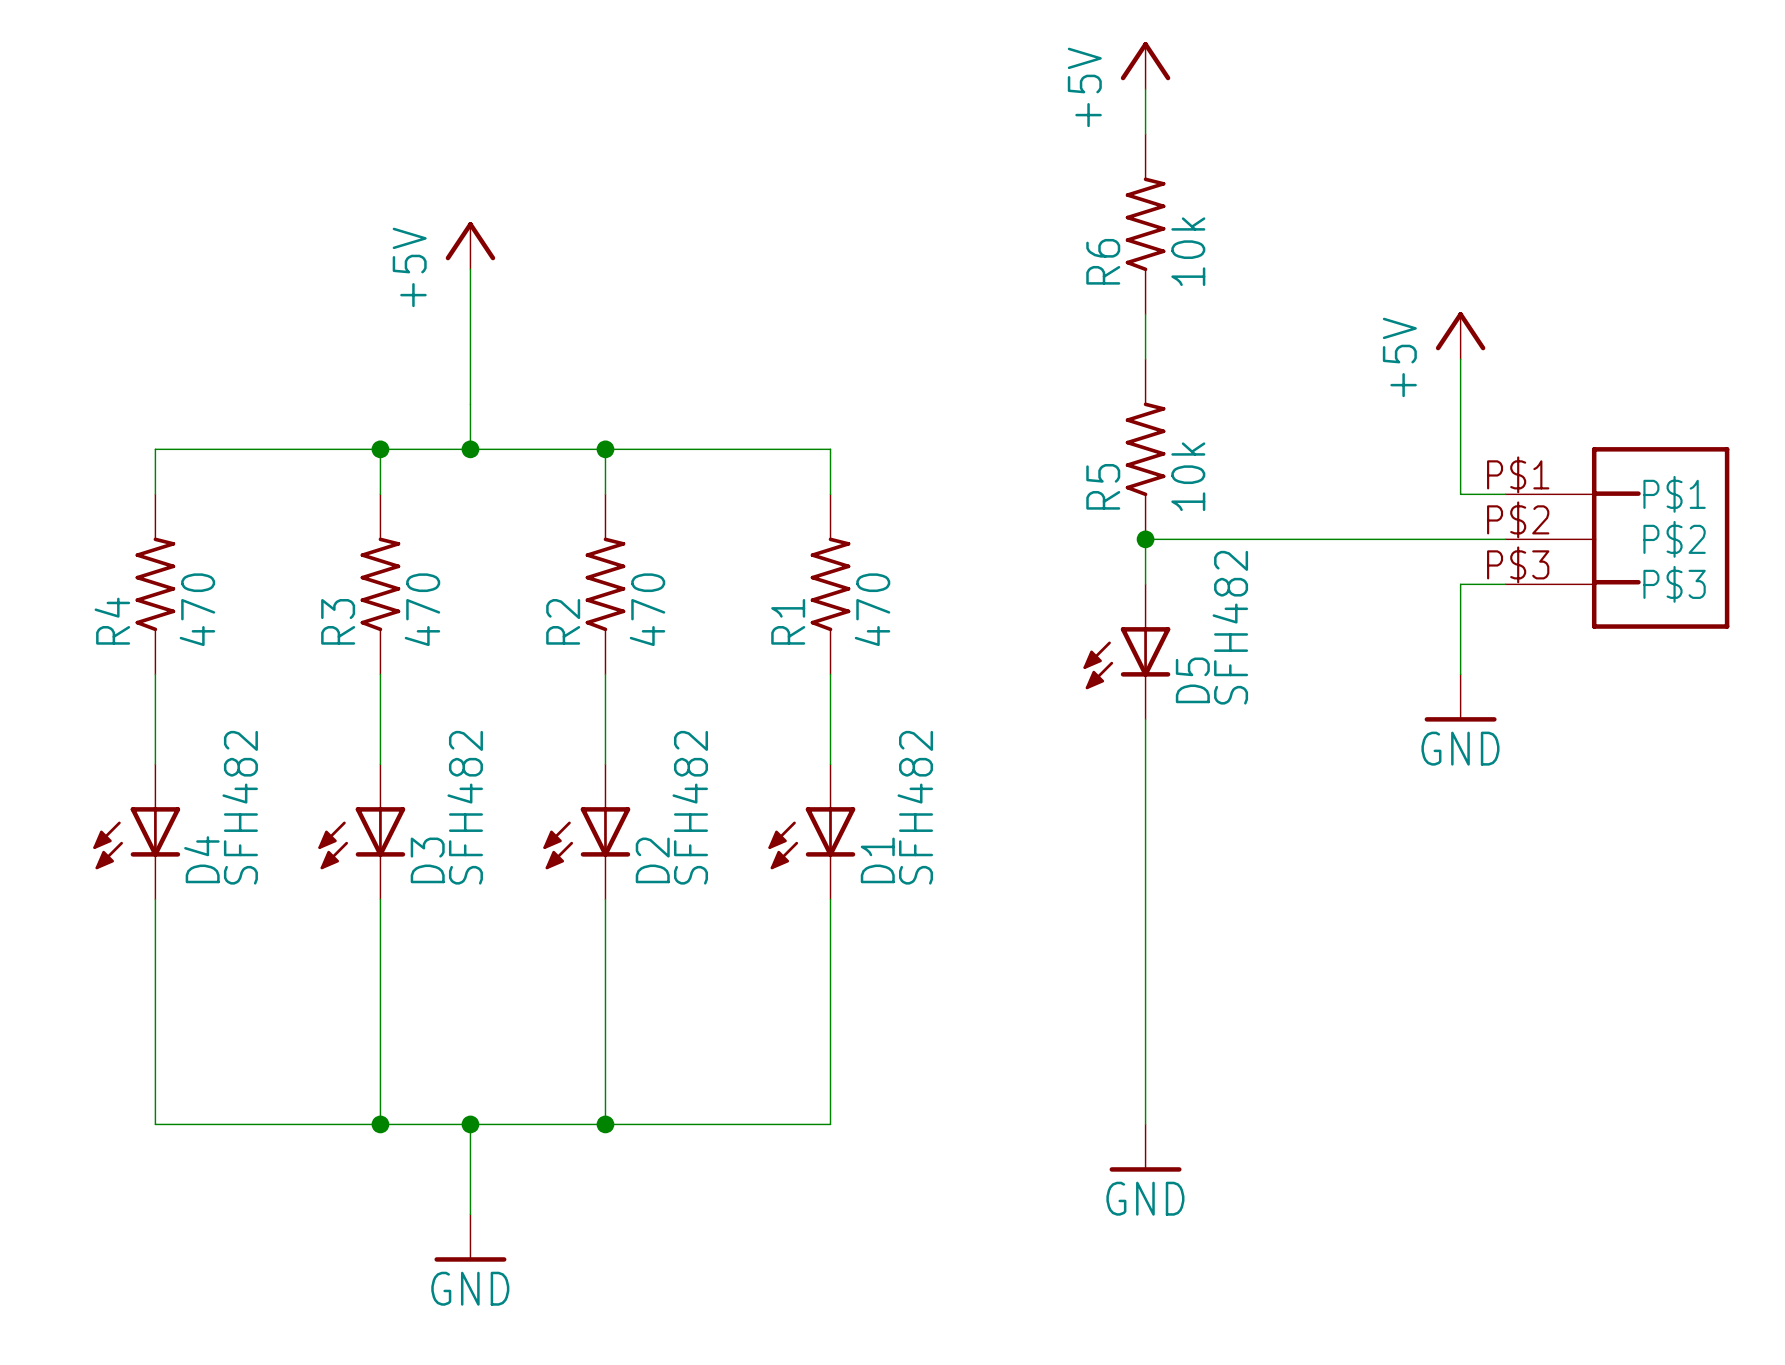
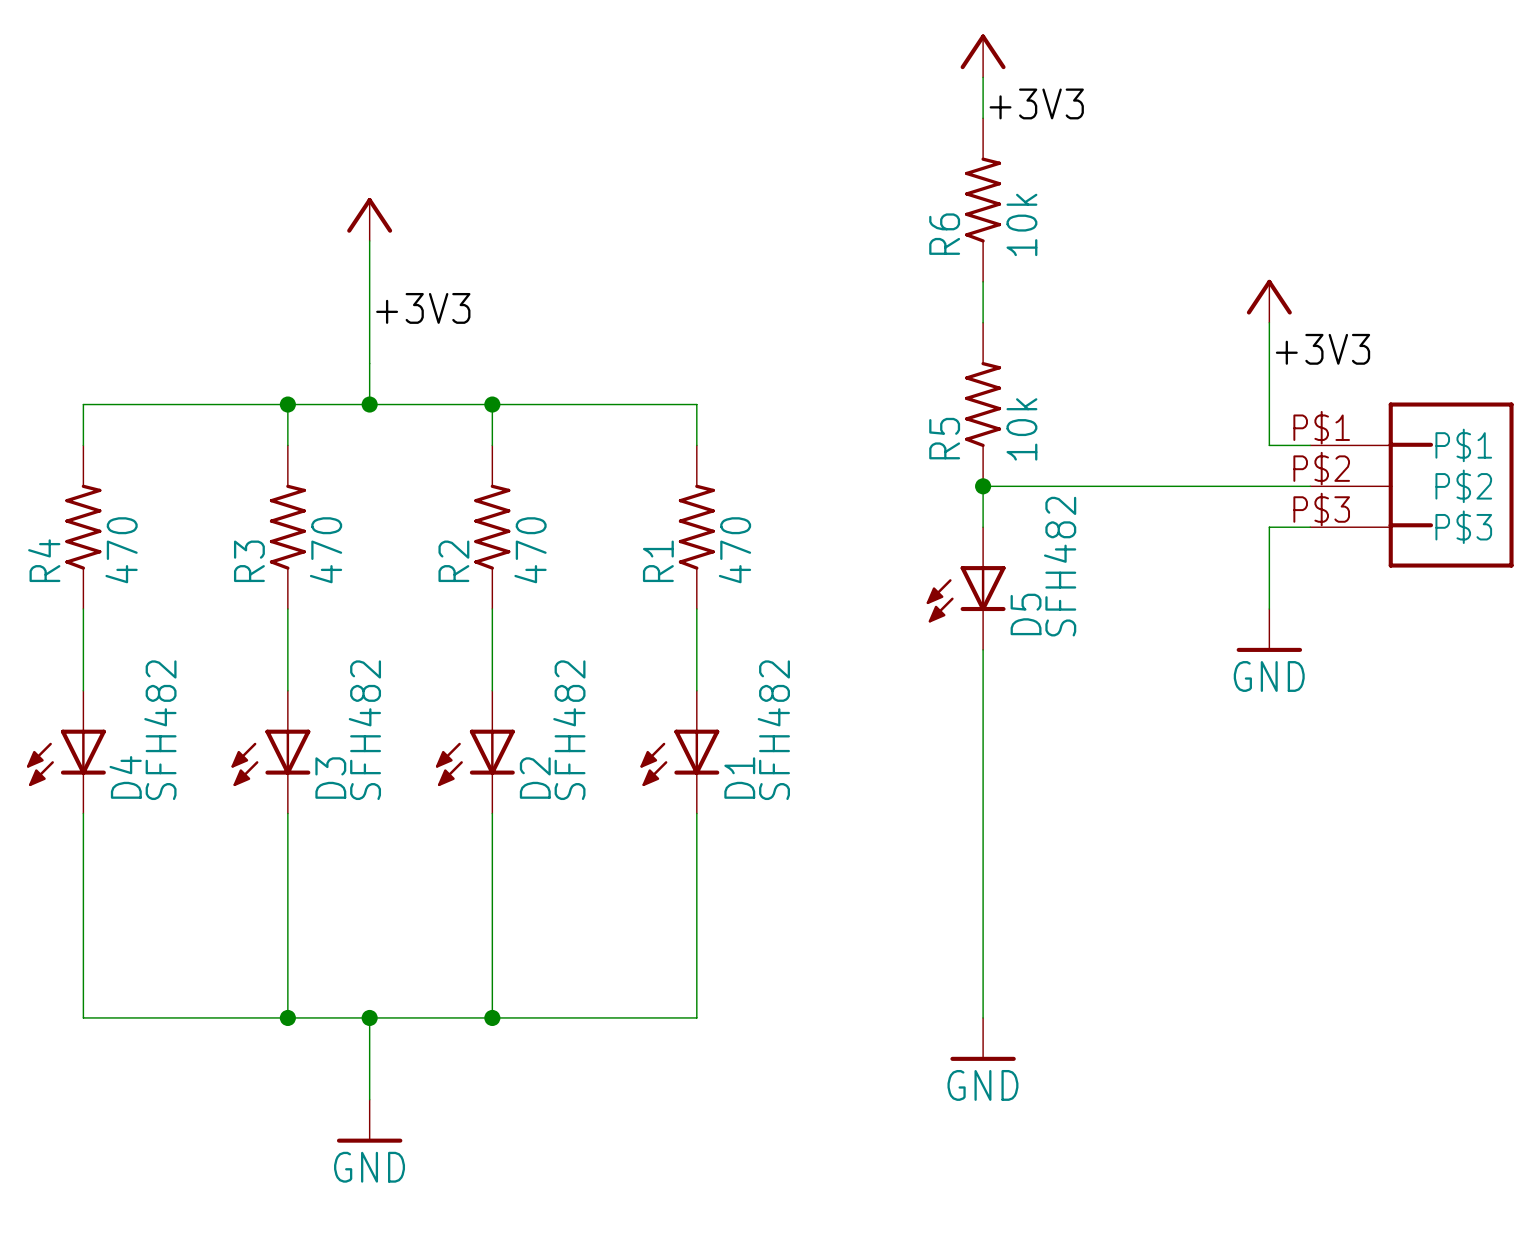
power symbol text: +5V (1084, 87) -> none
label: none -> +3V3 (1036, 103)
power symbol text: +5V (409, 267) -> none
label: none -> +3V3 (423, 308)
power symbol text: +5V (1399, 357) -> none
label: none -> +3V3 (1323, 349)

